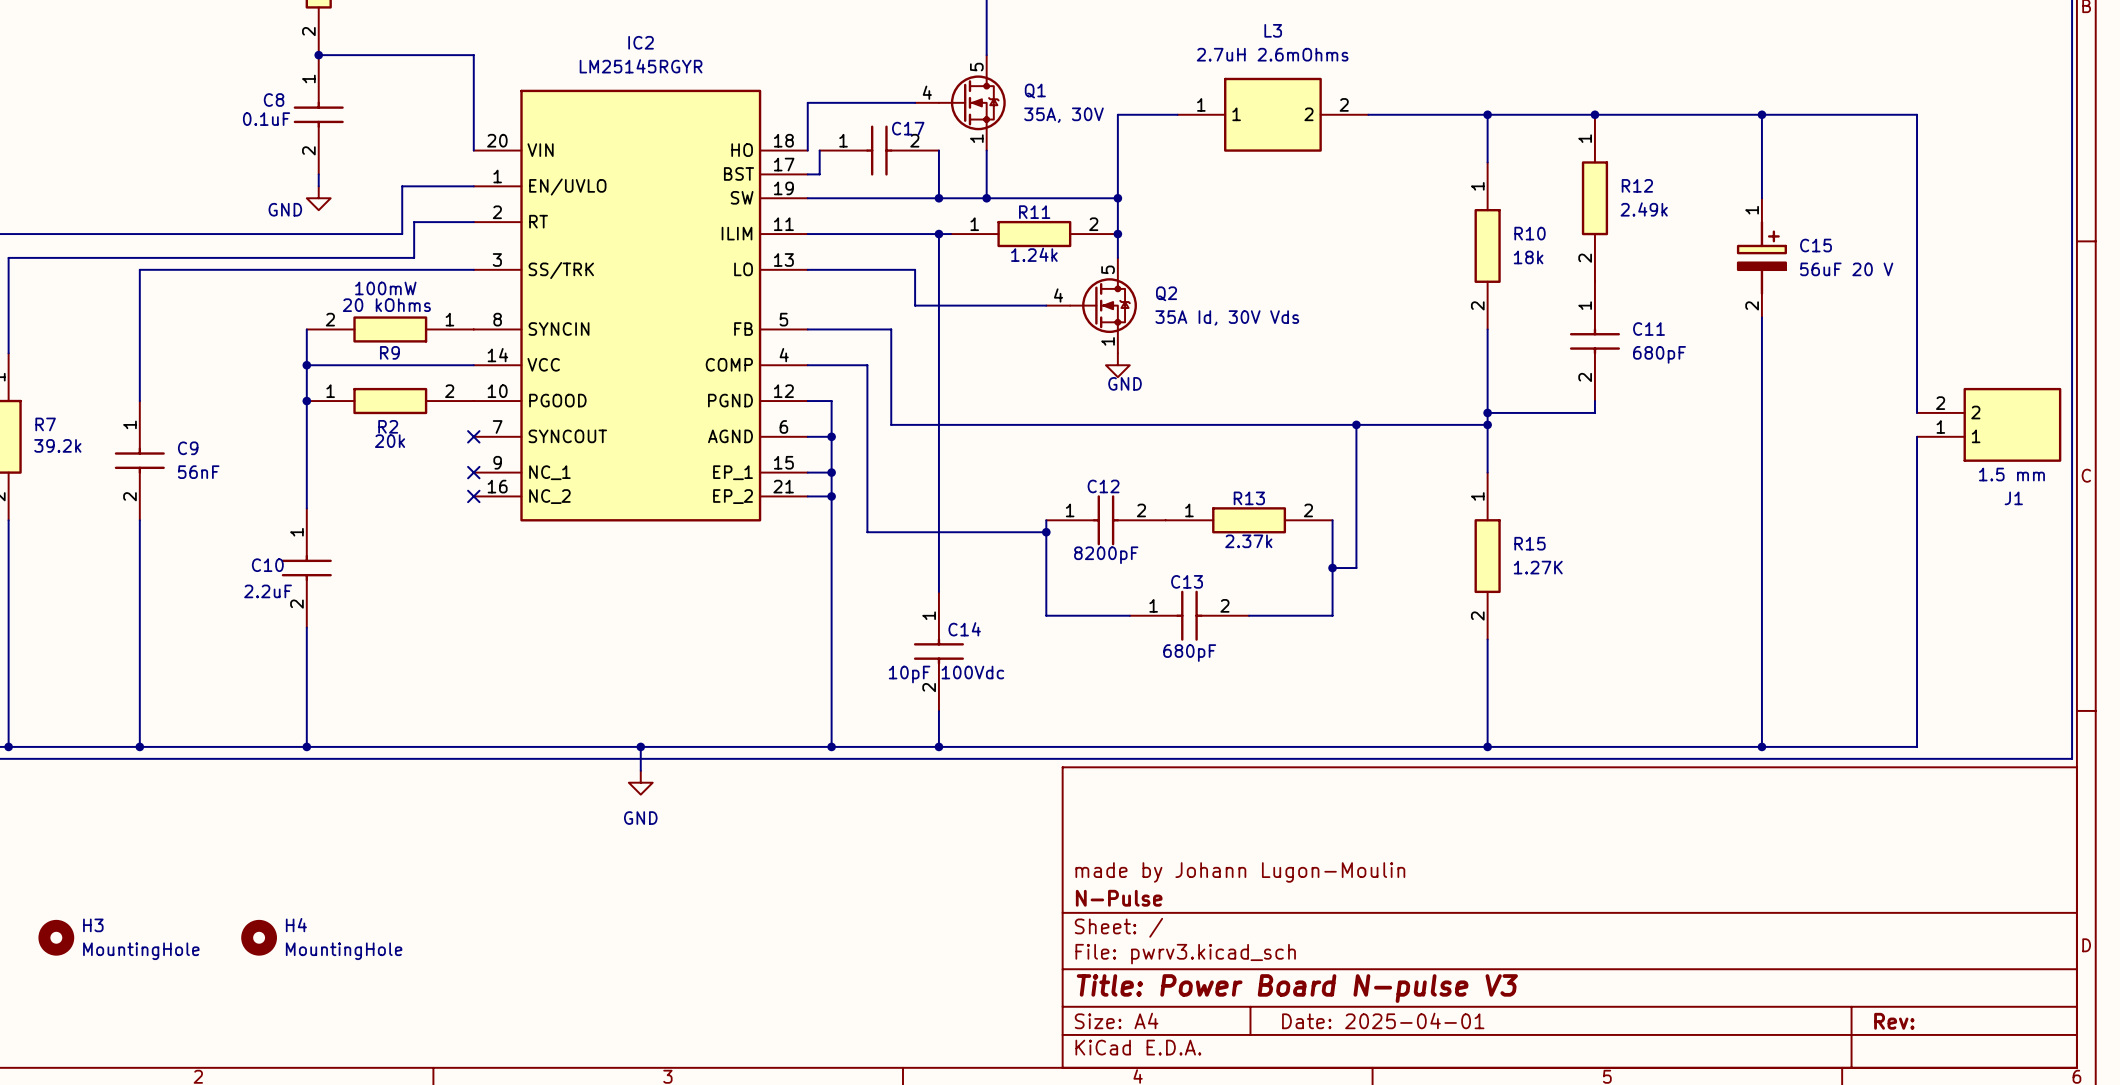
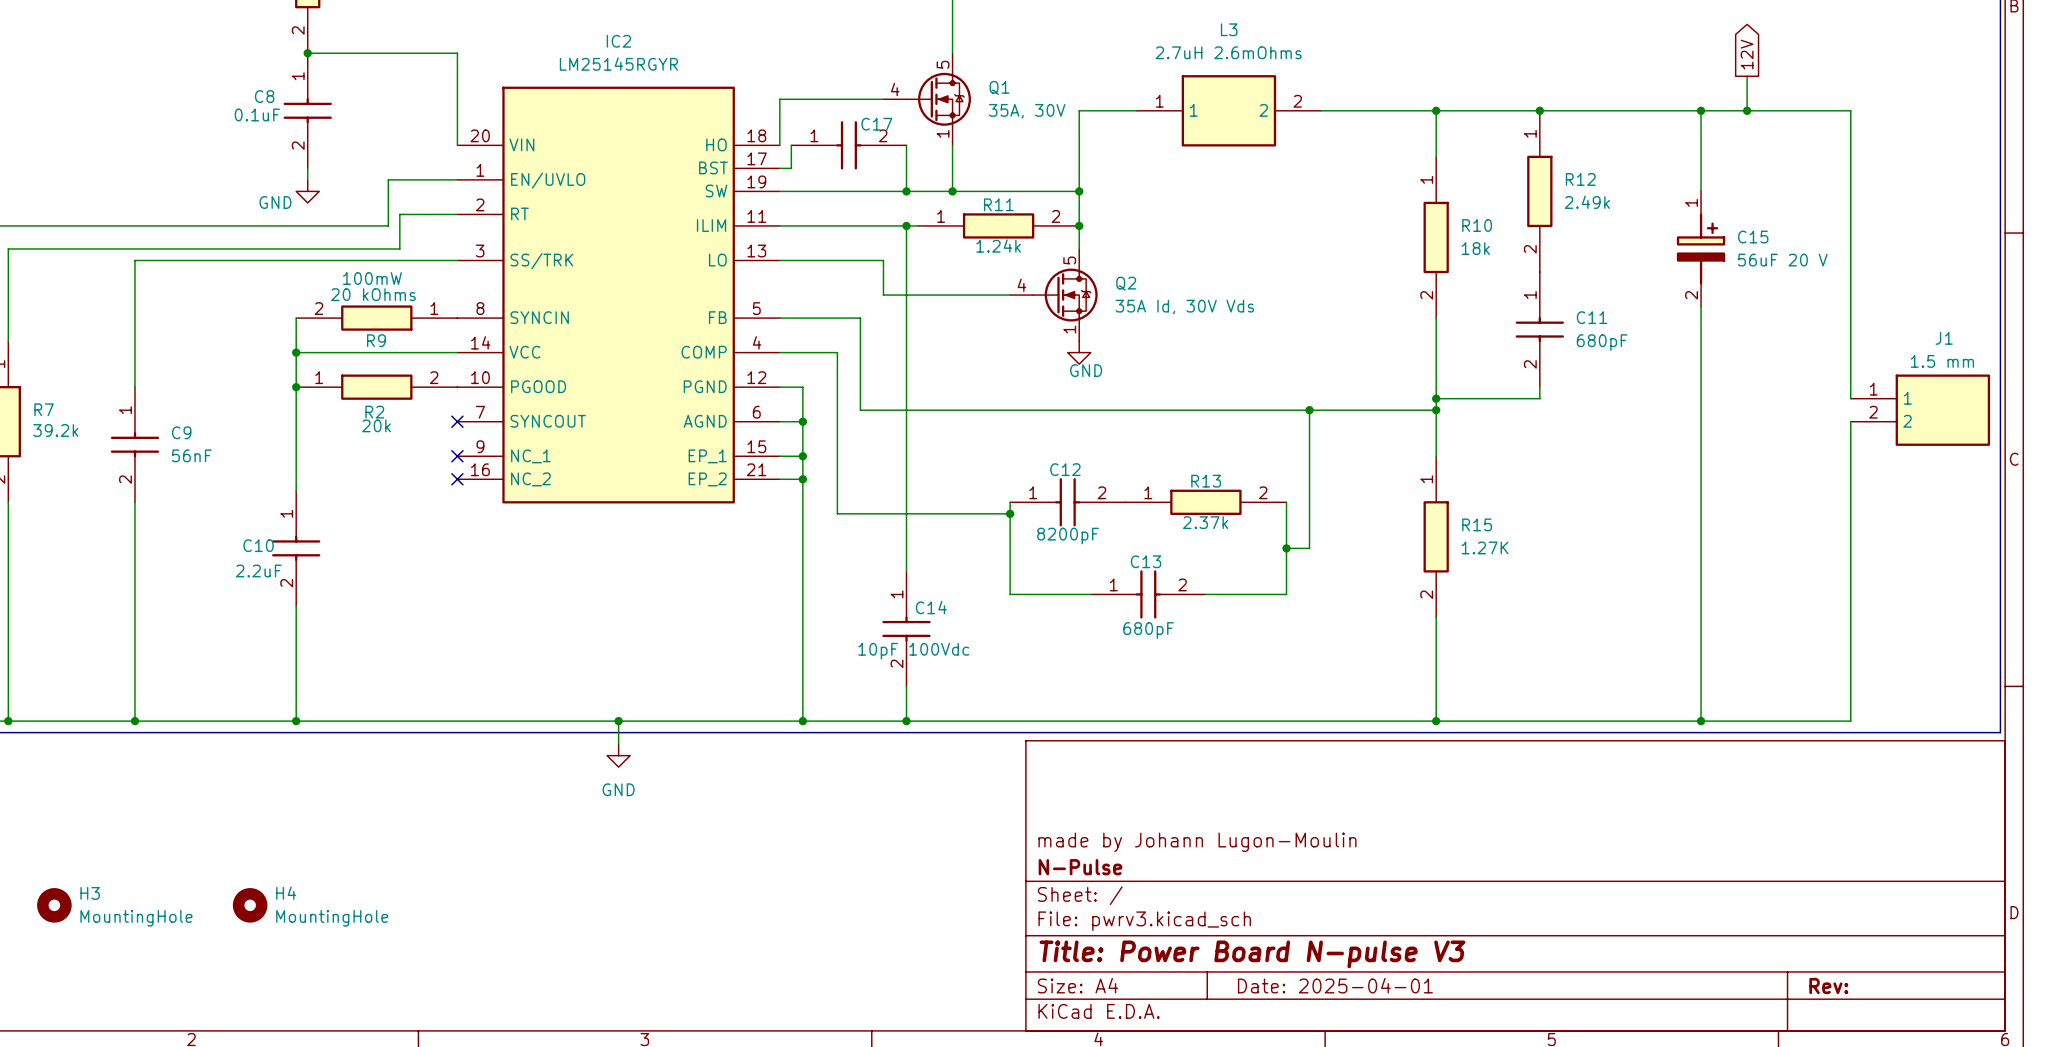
global label: none -> 12V (1747, 54)
wire: none -> (1747, 76) (1747, 110)
junction: none -> (1747, 110)
J1 flip: as is (2012, 424) -> up-down (1942, 410)

